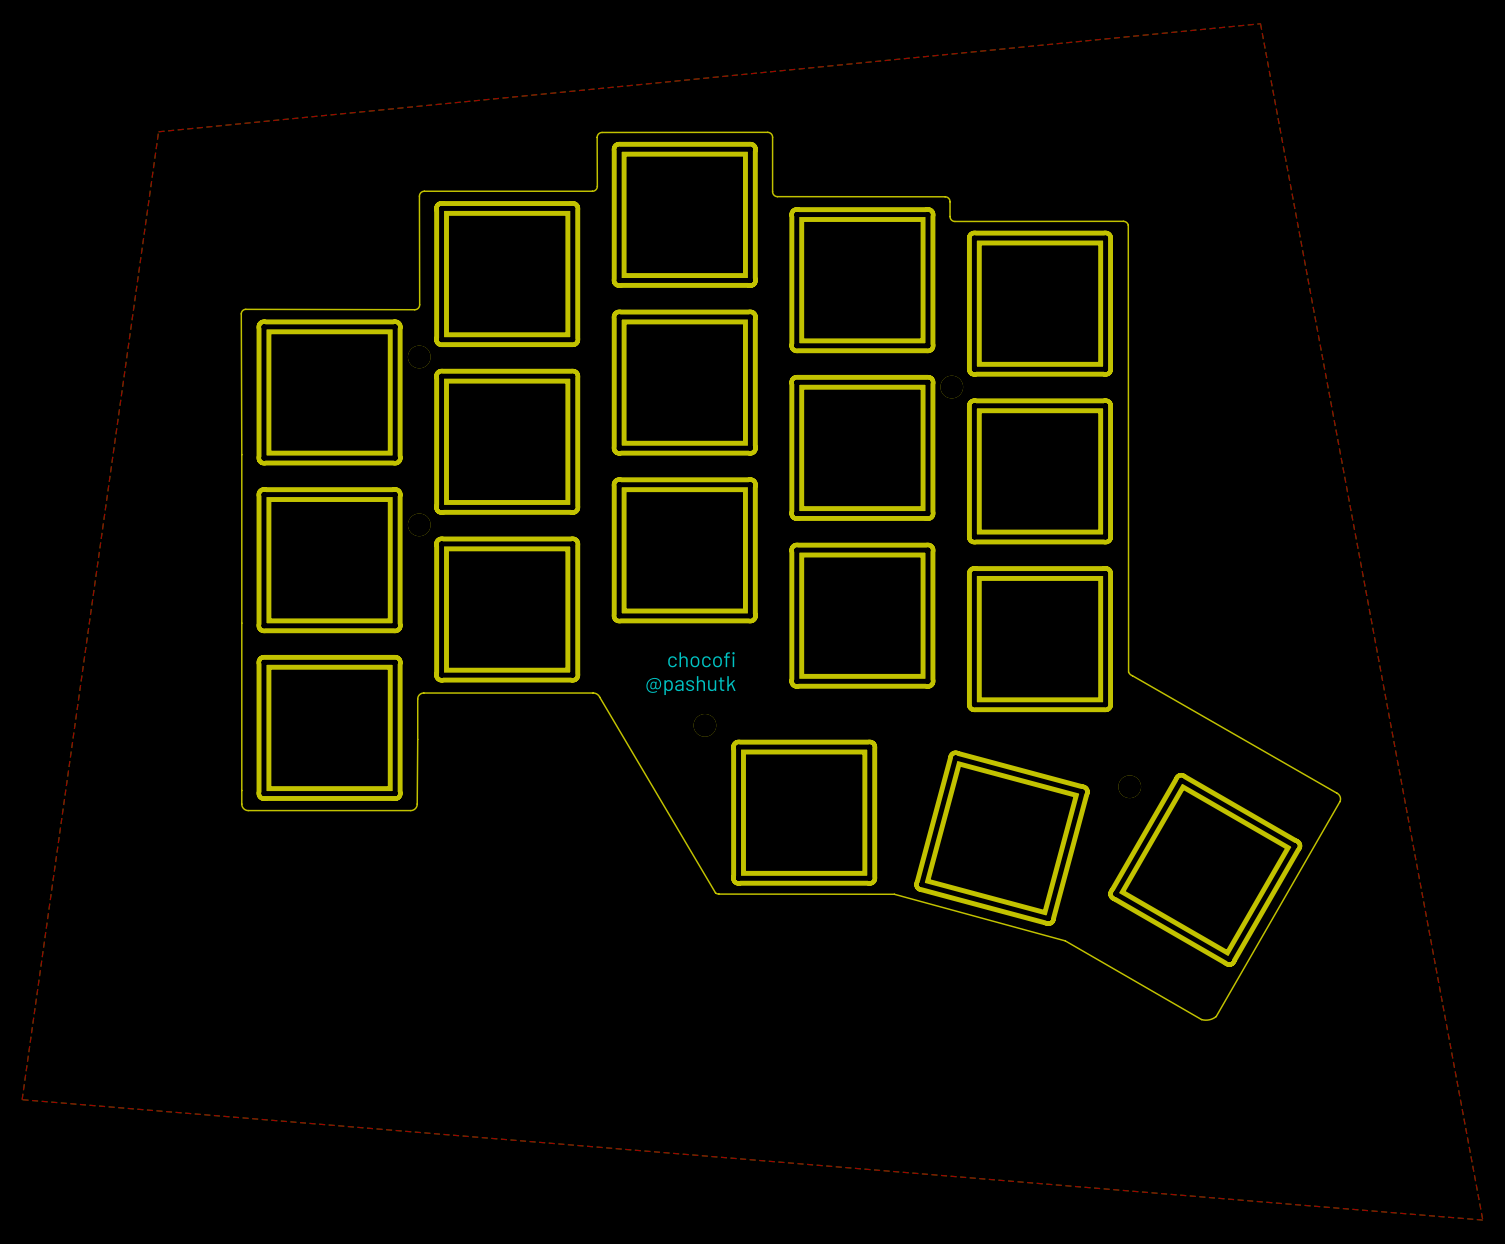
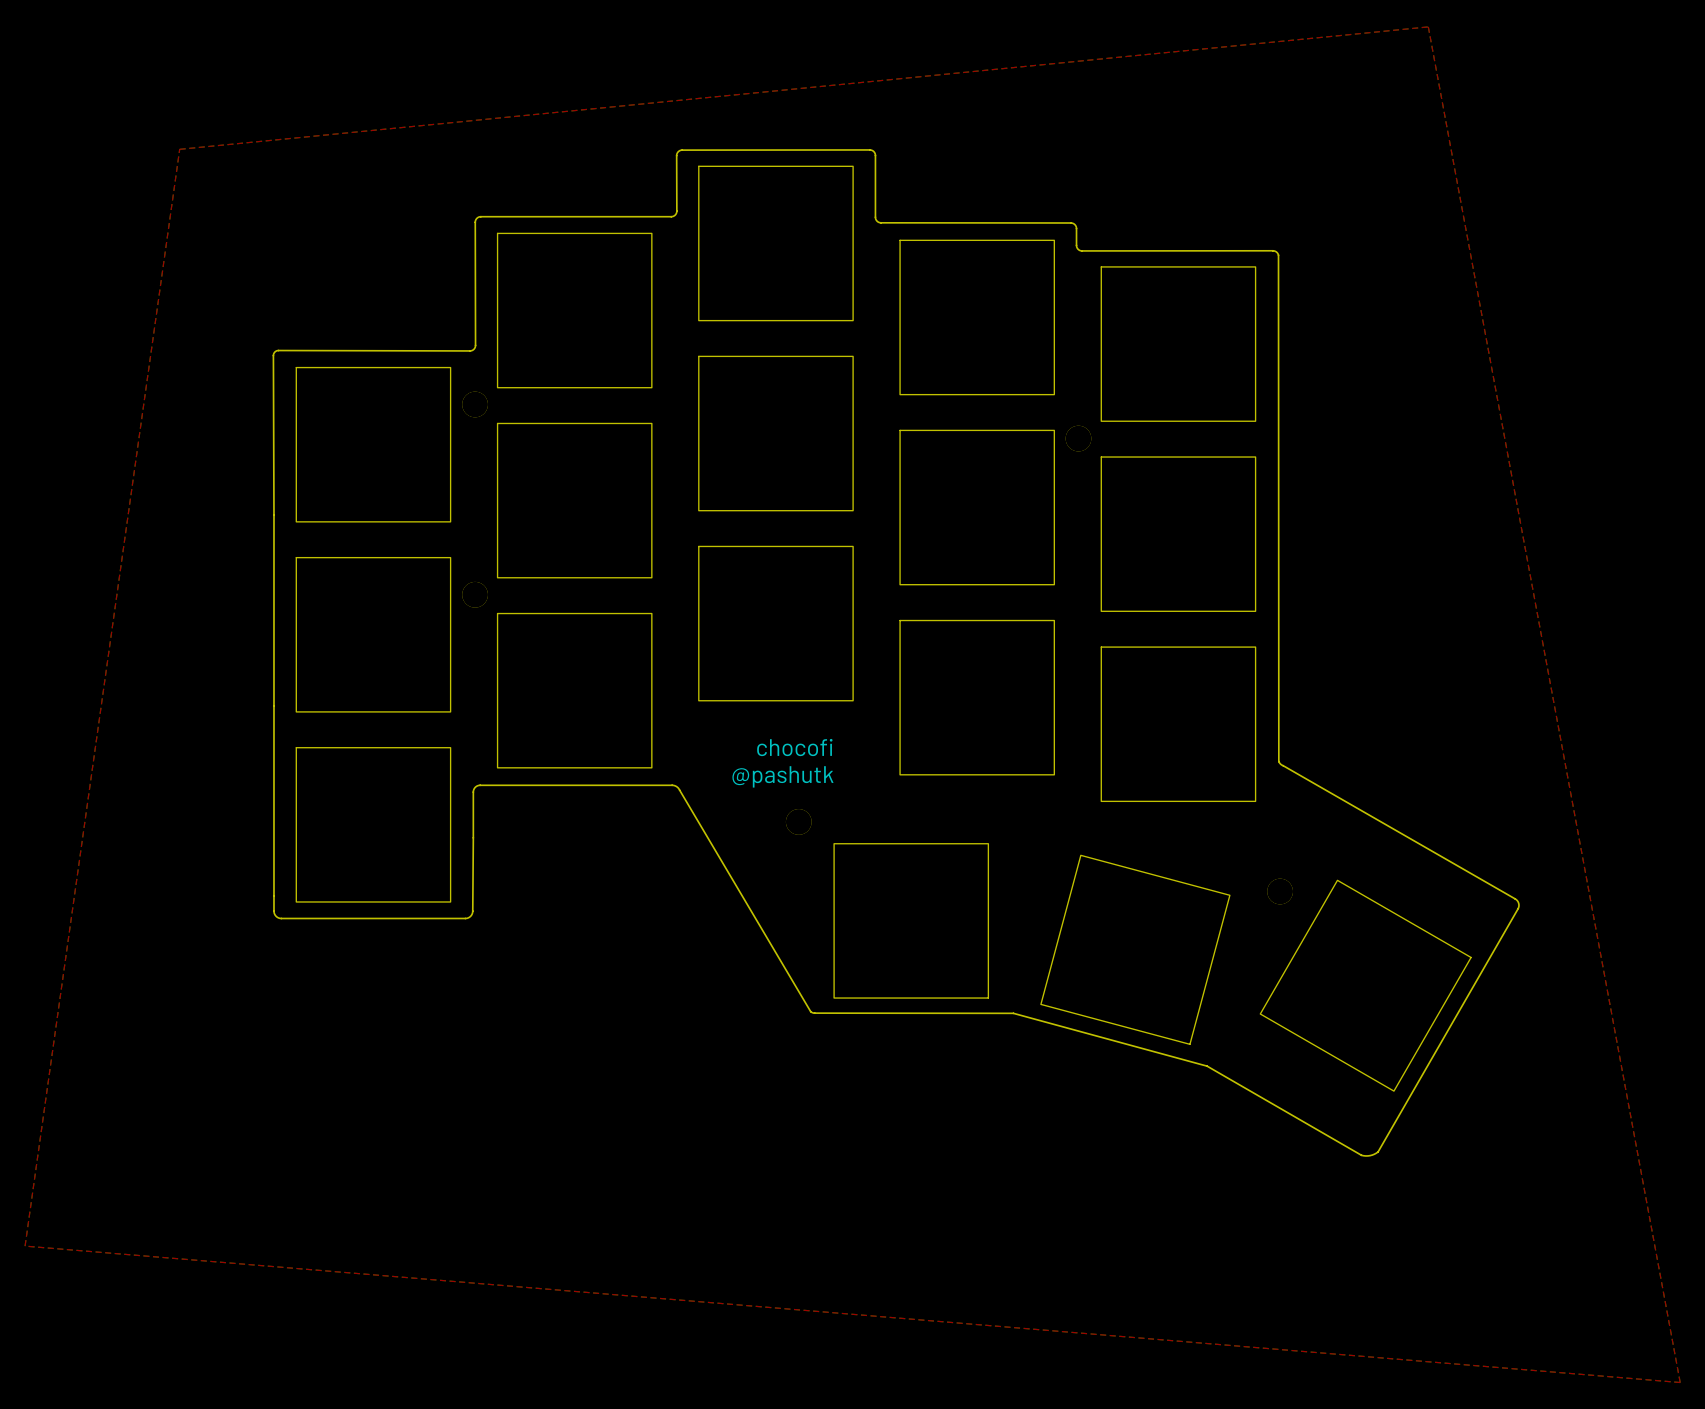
drawing: none -> [698, 165, 854, 322]
drawing: none -> [496, 232, 653, 389]
drawing: none -> [899, 239, 1056, 396]
part: (684, 214) -> none
drawing: none -> [1100, 266, 1257, 422]
part: (507, 274) -> none
part: (862, 280) -> none
part: (1039, 303) -> none
drawing: none -> [698, 355, 854, 512]
drawing: none -> [295, 366, 452, 523]
drawing: none -> [496, 422, 653, 579]
drawing: none -> [899, 429, 1056, 586]
part: (684, 382) -> none
part: (329, 392) -> none
drawing: none -> [1100, 456, 1257, 612]
part: (507, 441) -> none
part: (862, 447) -> none
part: (1039, 471) -> none
drawing: none -> [698, 545, 854, 702]
drawing: none -> [295, 556, 452, 713]
drawing: none -> [496, 612, 653, 769]
drawing: none -> [899, 619, 1056, 776]
part: (684, 550) -> none
part: (329, 560) -> none
drawing: none -> [1100, 646, 1257, 803]
part: (507, 609) -> none
part: (862, 615) -> none
part: (1039, 639) -> none
drawing: none -> [295, 747, 452, 903]
part: (329, 727) -> none
drawing: none -> [833, 843, 990, 999]
drawing: none -> [1040, 854, 1231, 1045]
drawing: none -> [1259, 879, 1472, 1092]
part: (804, 812) -> none
part: (1001, 838) -> none
part: (1205, 869) -> none

